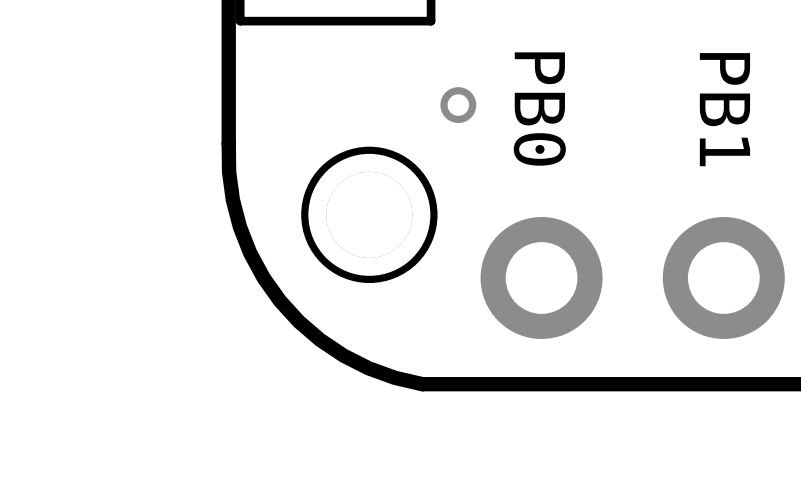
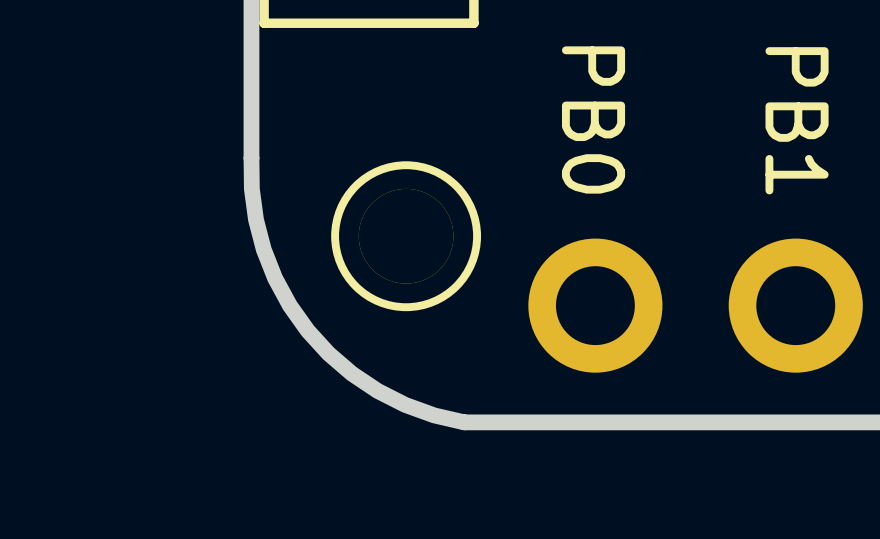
via: (458, 105) -> none

